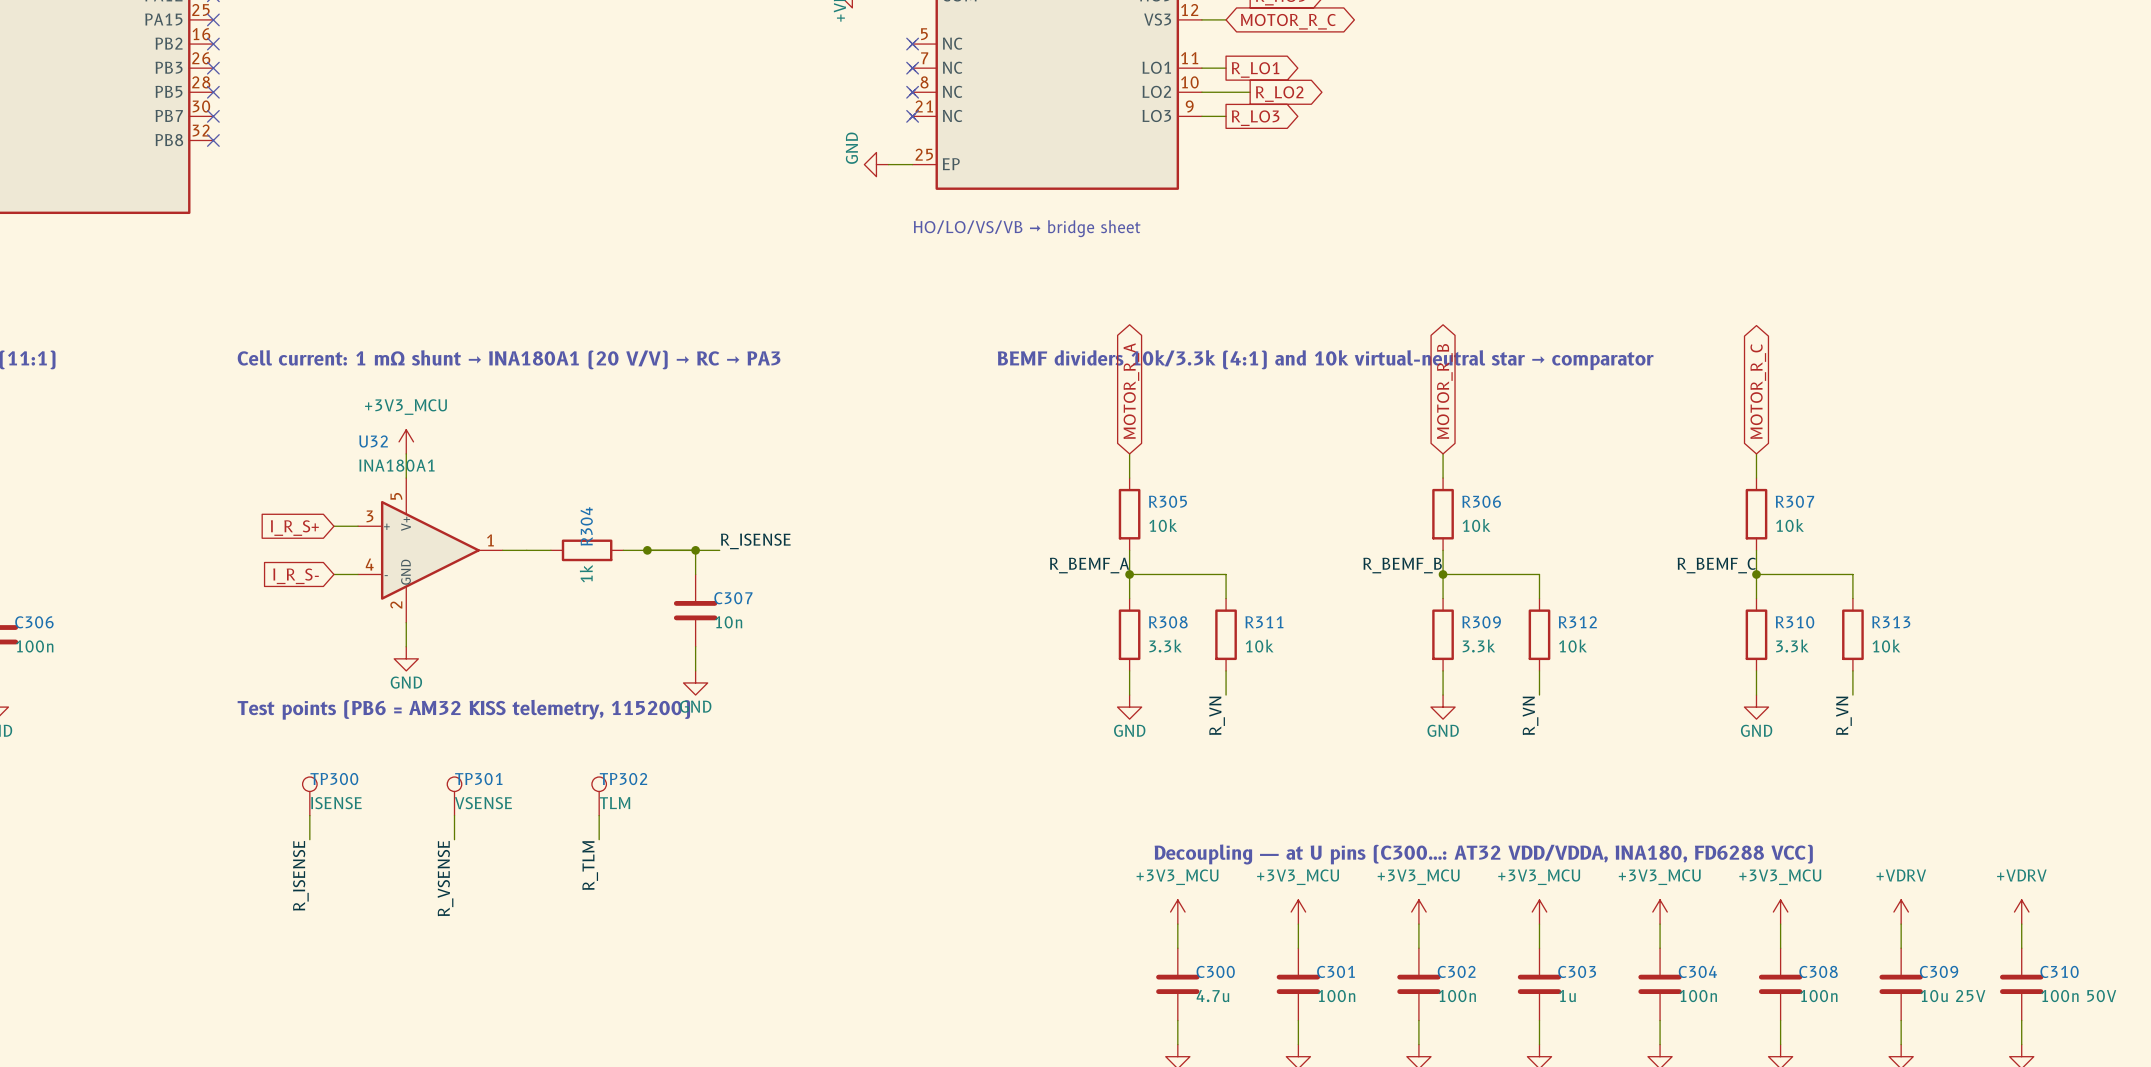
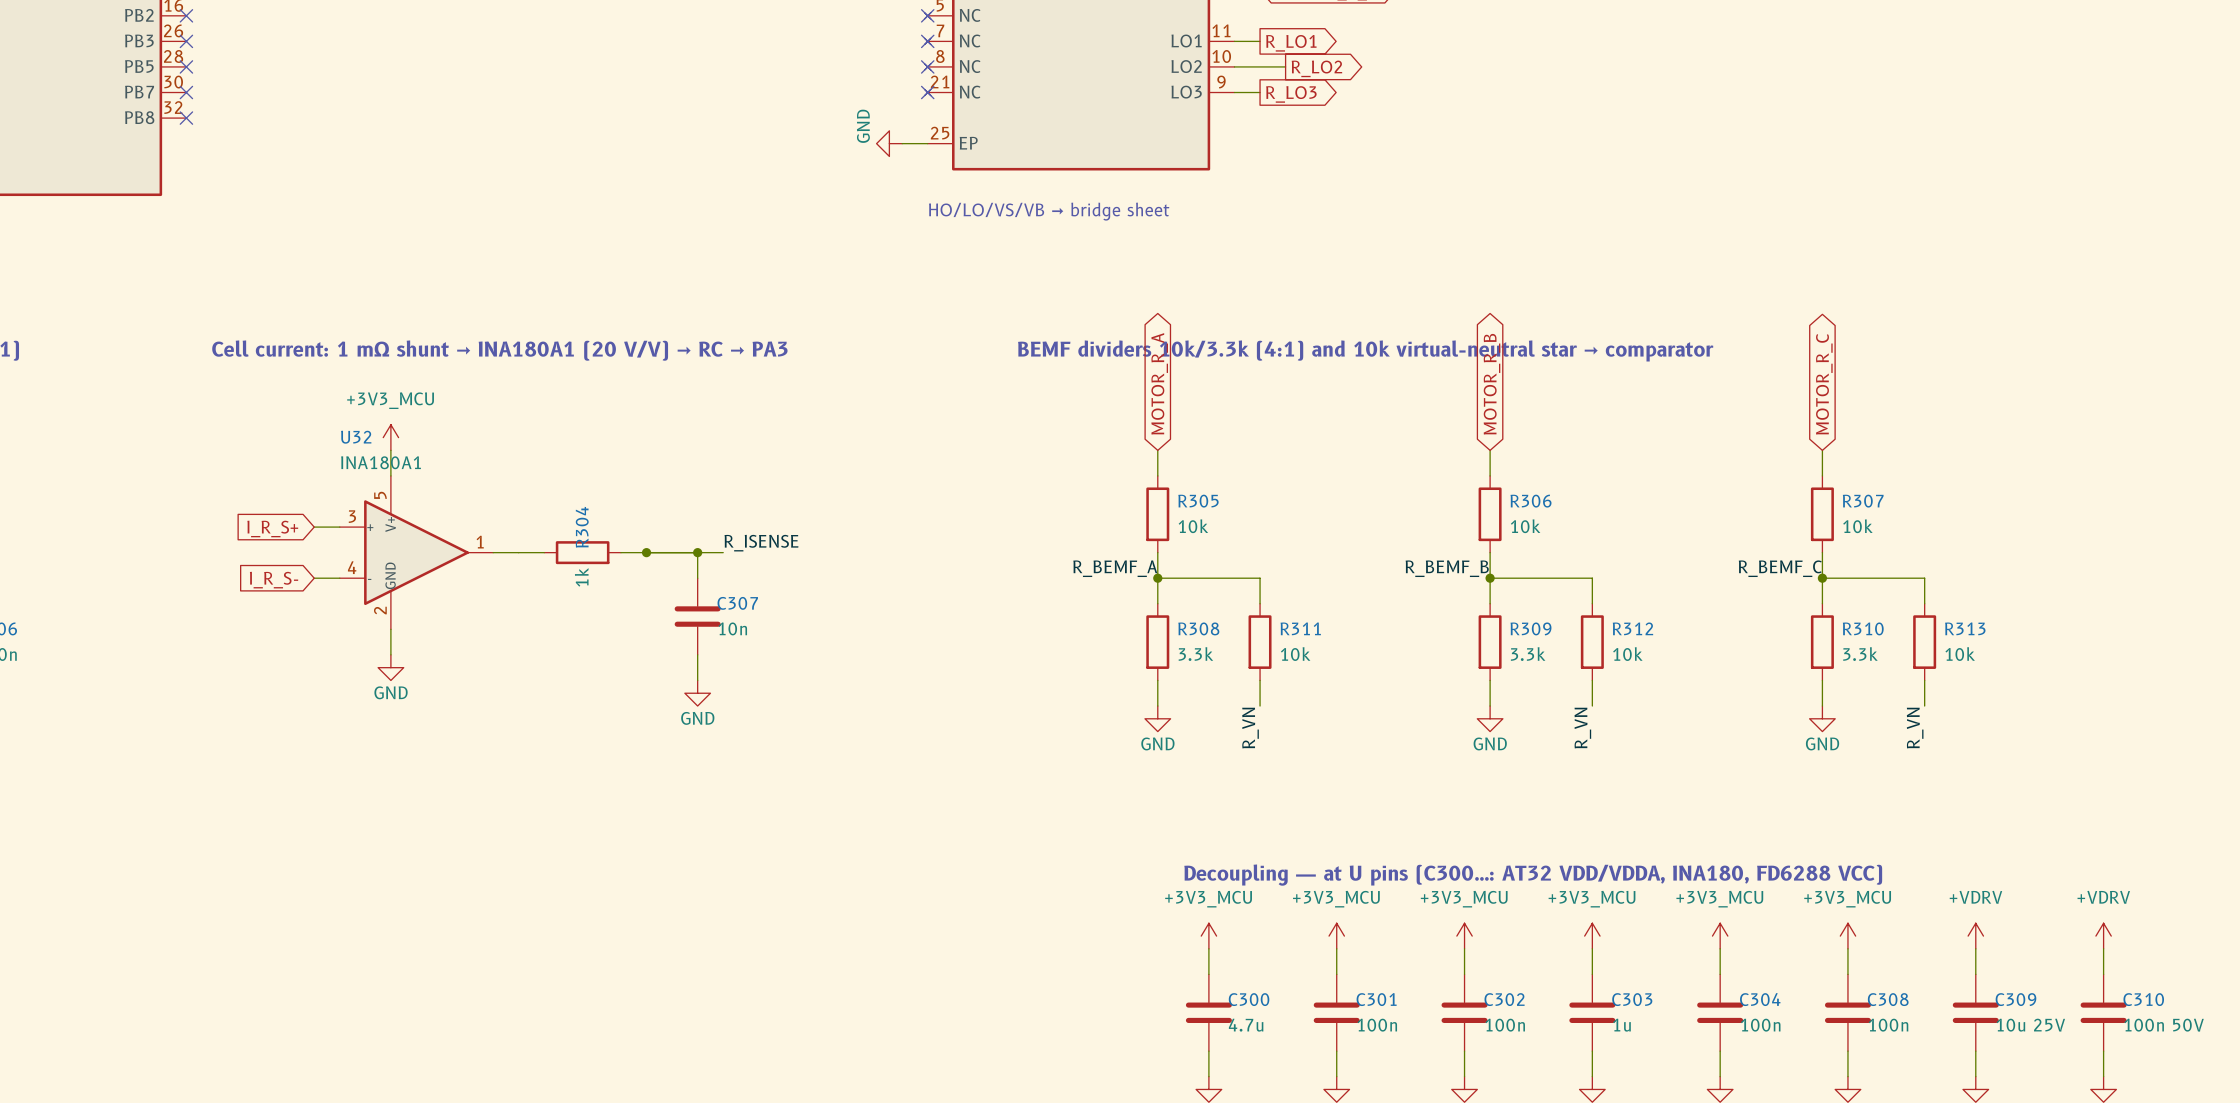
text: Test points (PB6 = AM32 KISS telemetry, 115200) (463, 709) -> none
TP300: ISENSE (309, 796) -> none
TP301: VSENSE (454, 796) -> none
TP302: TLM (599, 796) -> none
wire: (309, 815) (309, 839) -> none
wire: (454, 815) (454, 839) -> none
wire: (599, 815) (599, 839) -> none
label: R_TLM (590, 865) -> none
label: R_ISENSE (300, 875) -> none
label: R_VSENSE (445, 878) -> none

